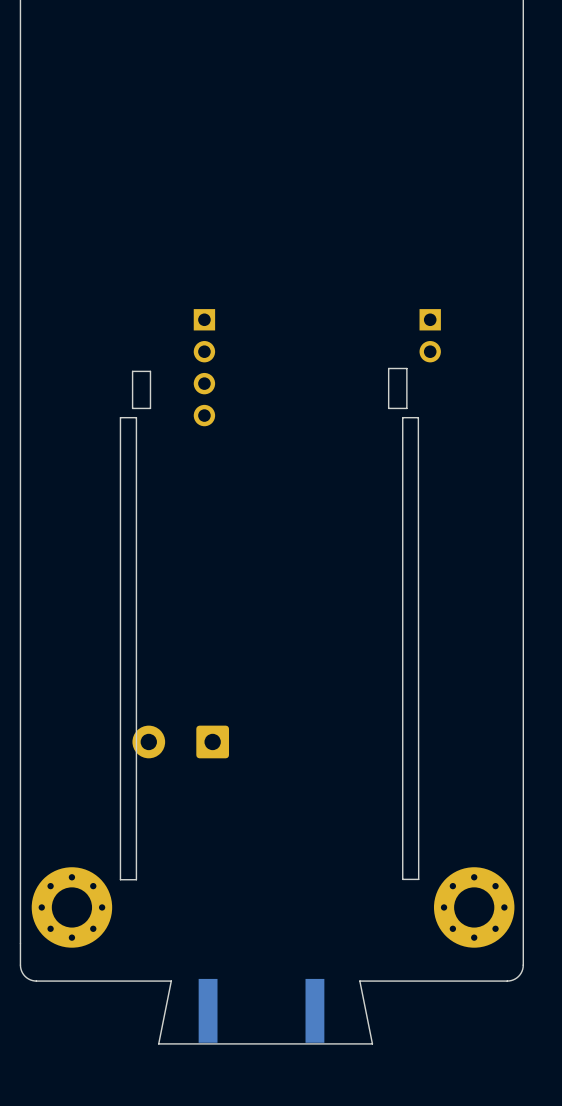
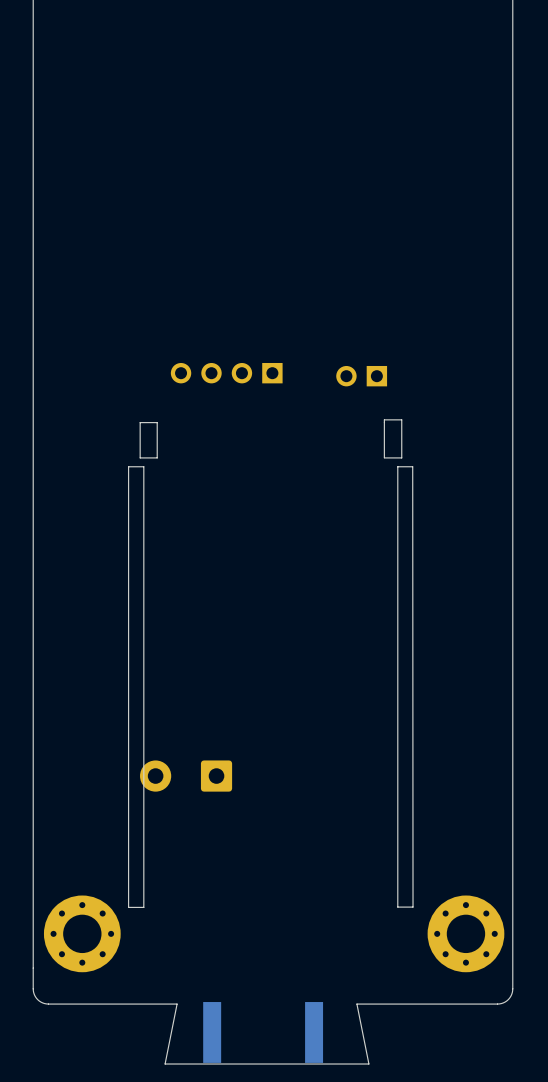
part rotation: 0° (430, 335) -> 90° clockwise (361, 376)
part position: (430, 335) -> (361, 376)
part rotation: 0° (204, 367) -> 90° clockwise (226, 373)

